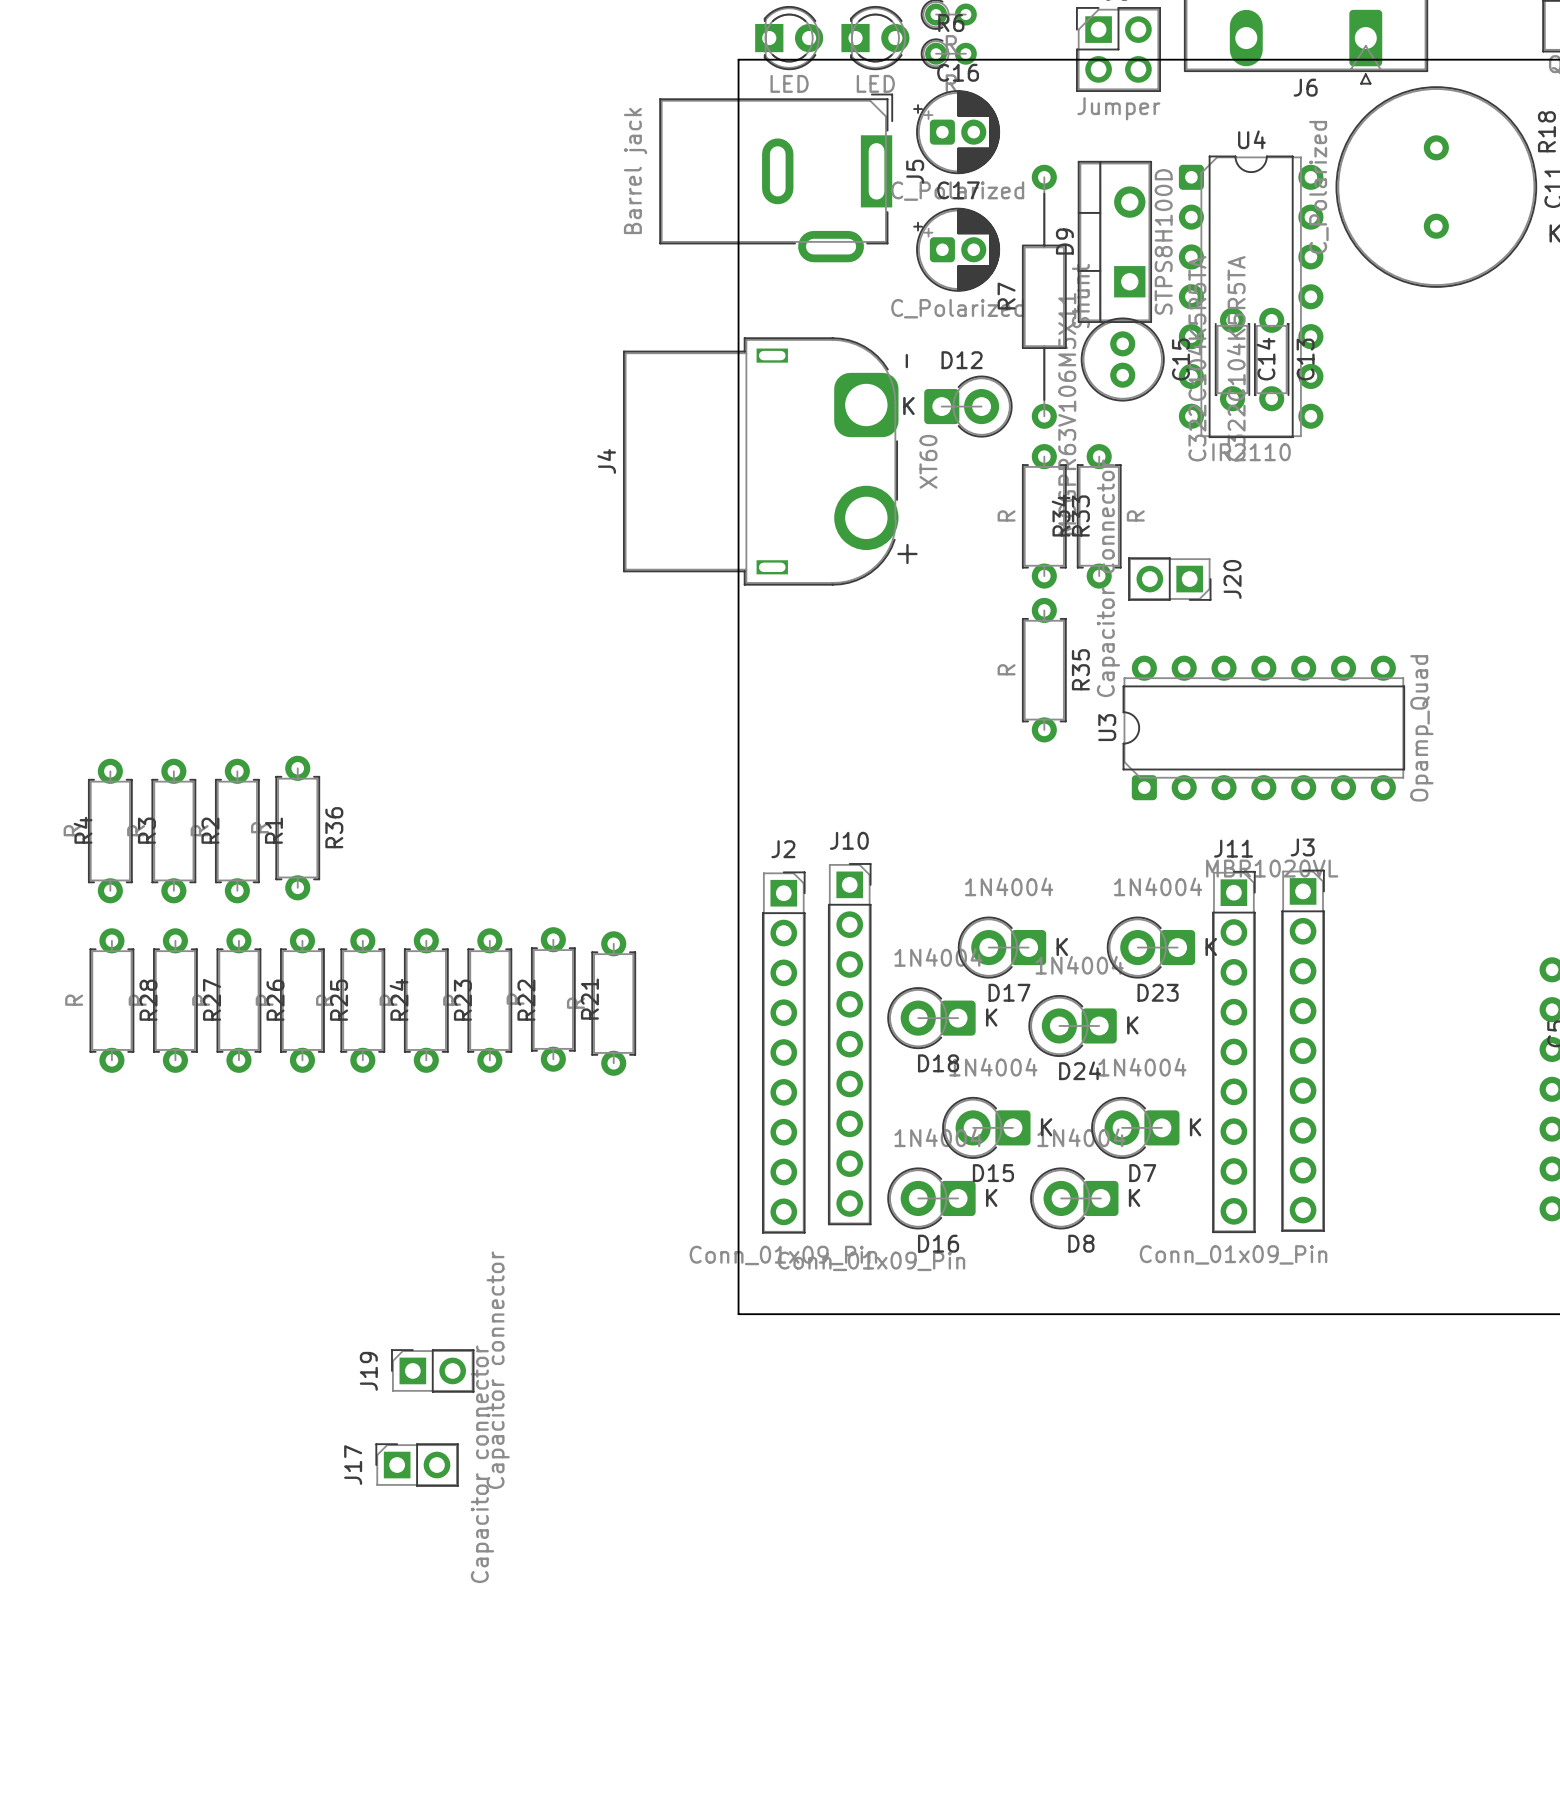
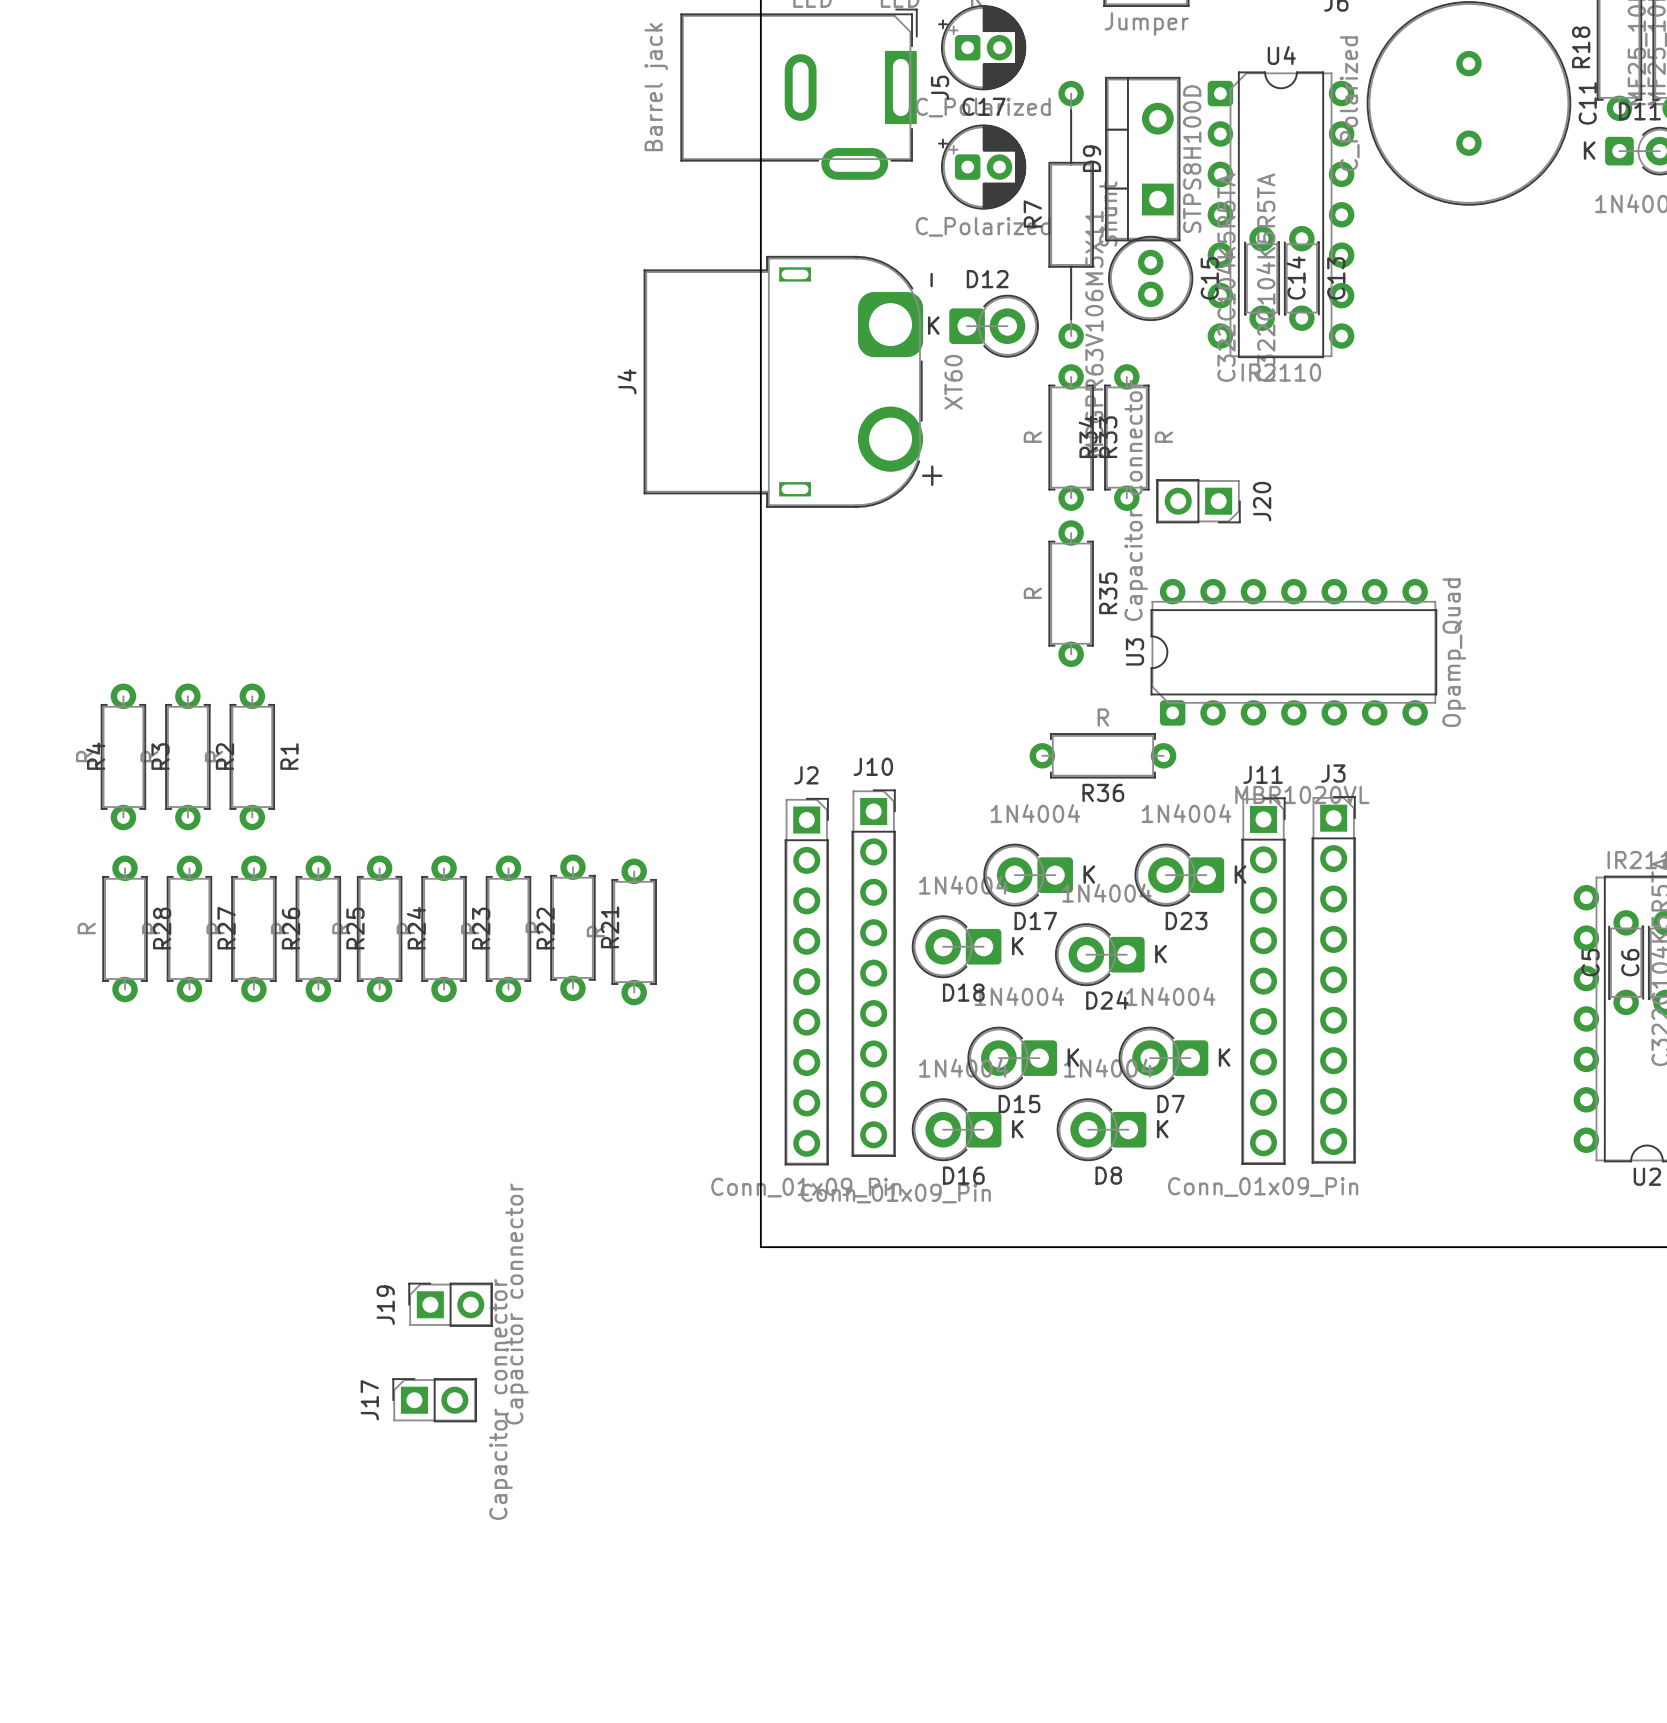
R36 rotation: 0° (297, 828) -> 90° clockwise (1102, 755)
R36 position: (297, 828) -> (1102, 755)

